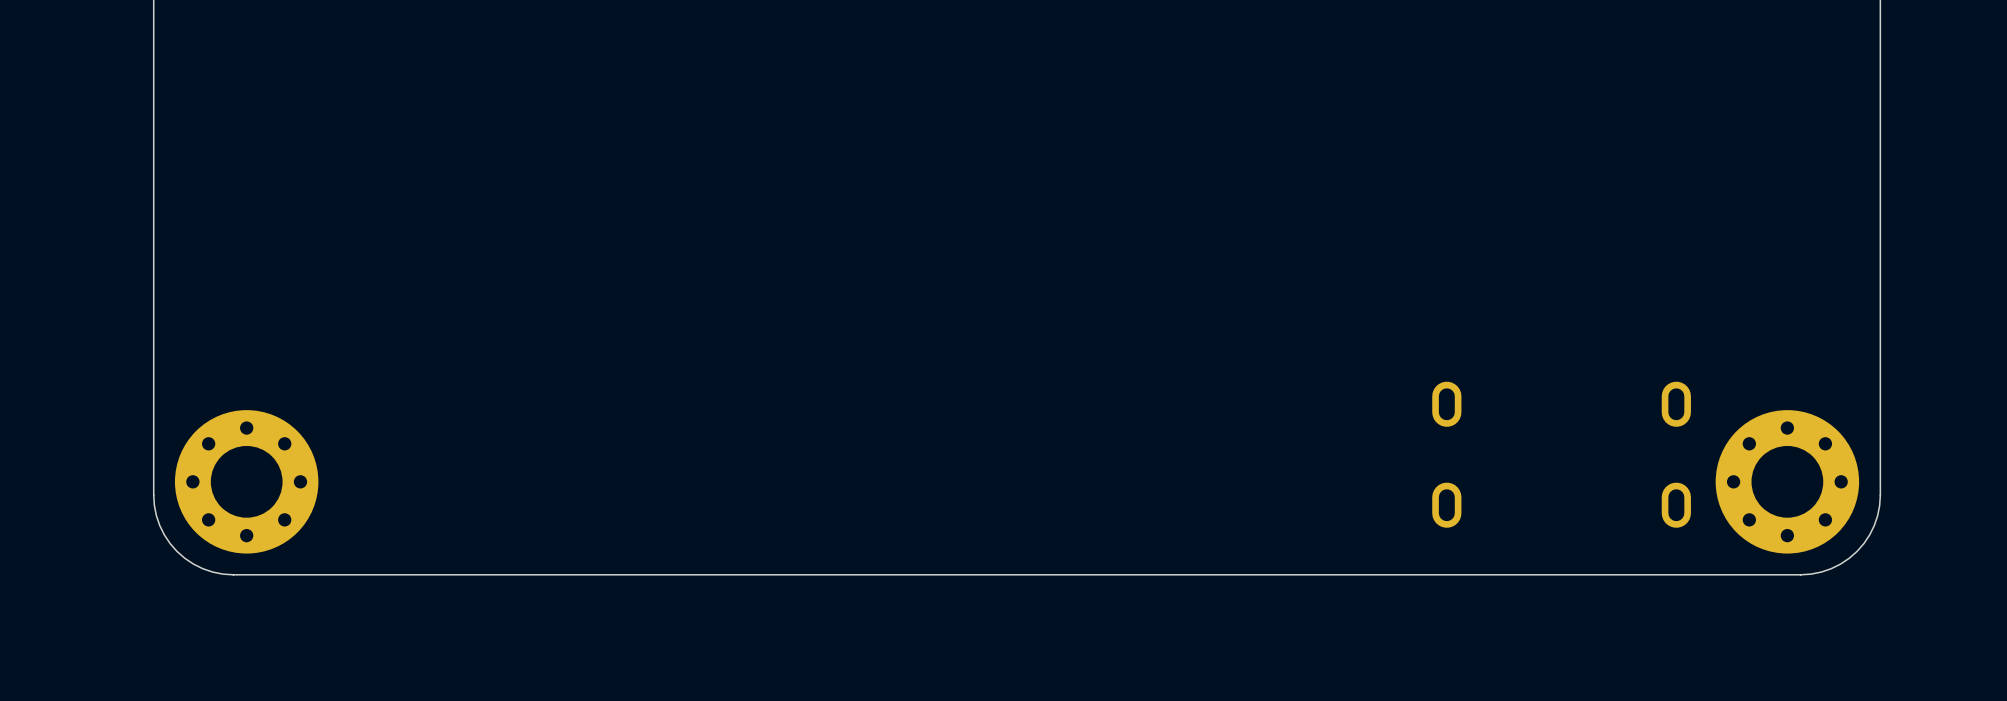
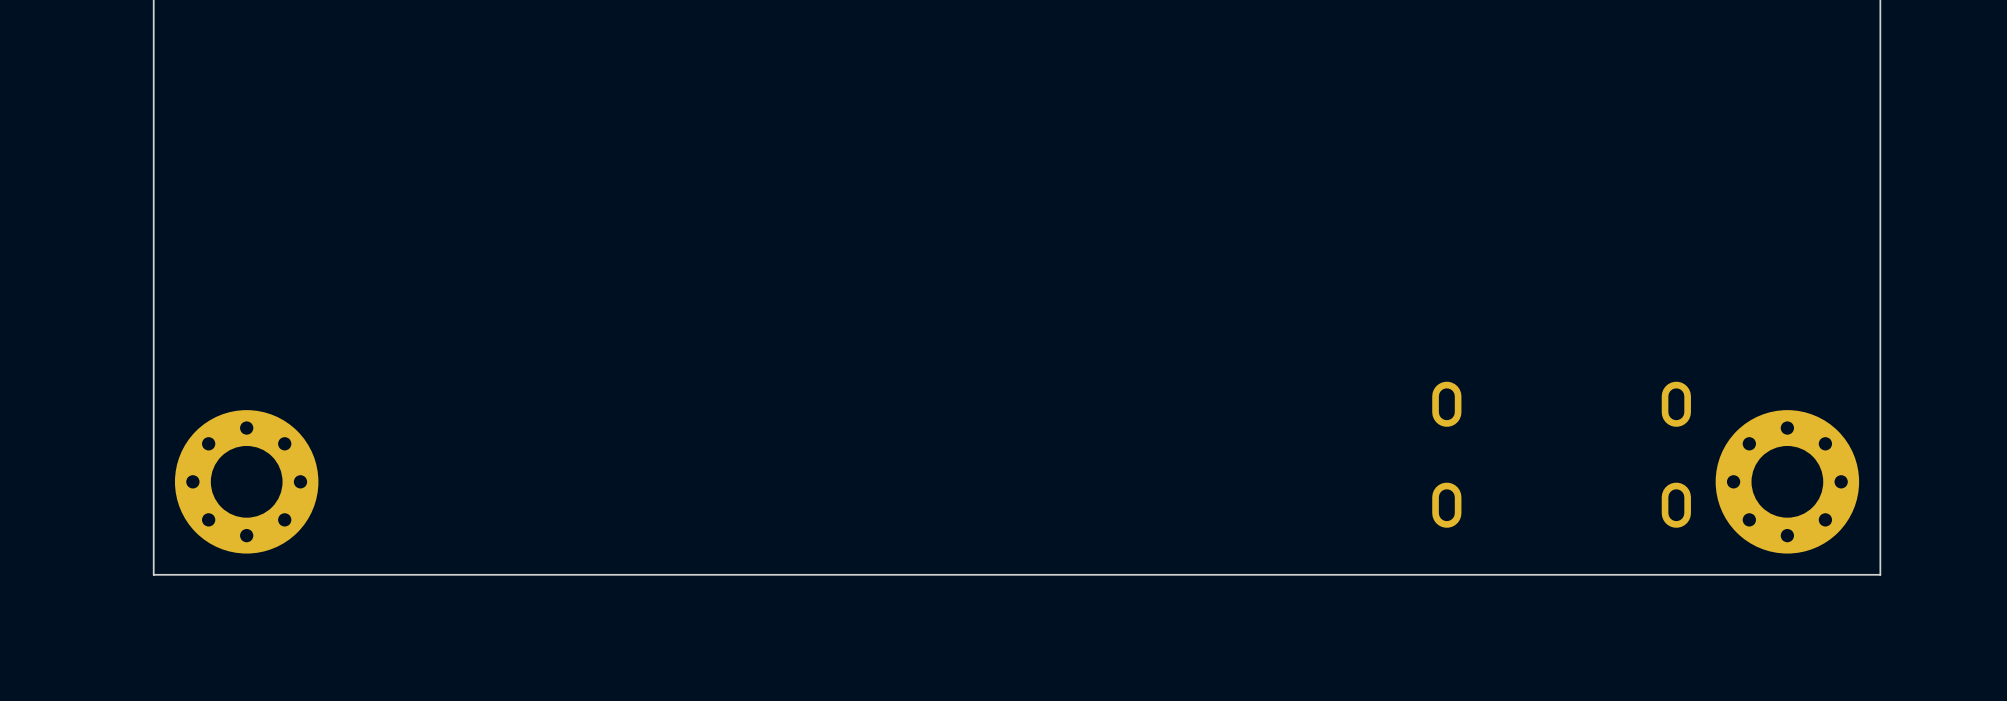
board edge: (153, 495) (159, 525) (177, 551) (202, 568) (233, 574) -> (153, 495) (153, 574) (233, 574)
board edge: (1880, 495) (1874, 525) (1857, 551) (1831, 568) (1800, 574) -> (1880, 495) (1880, 574) (1800, 574)

